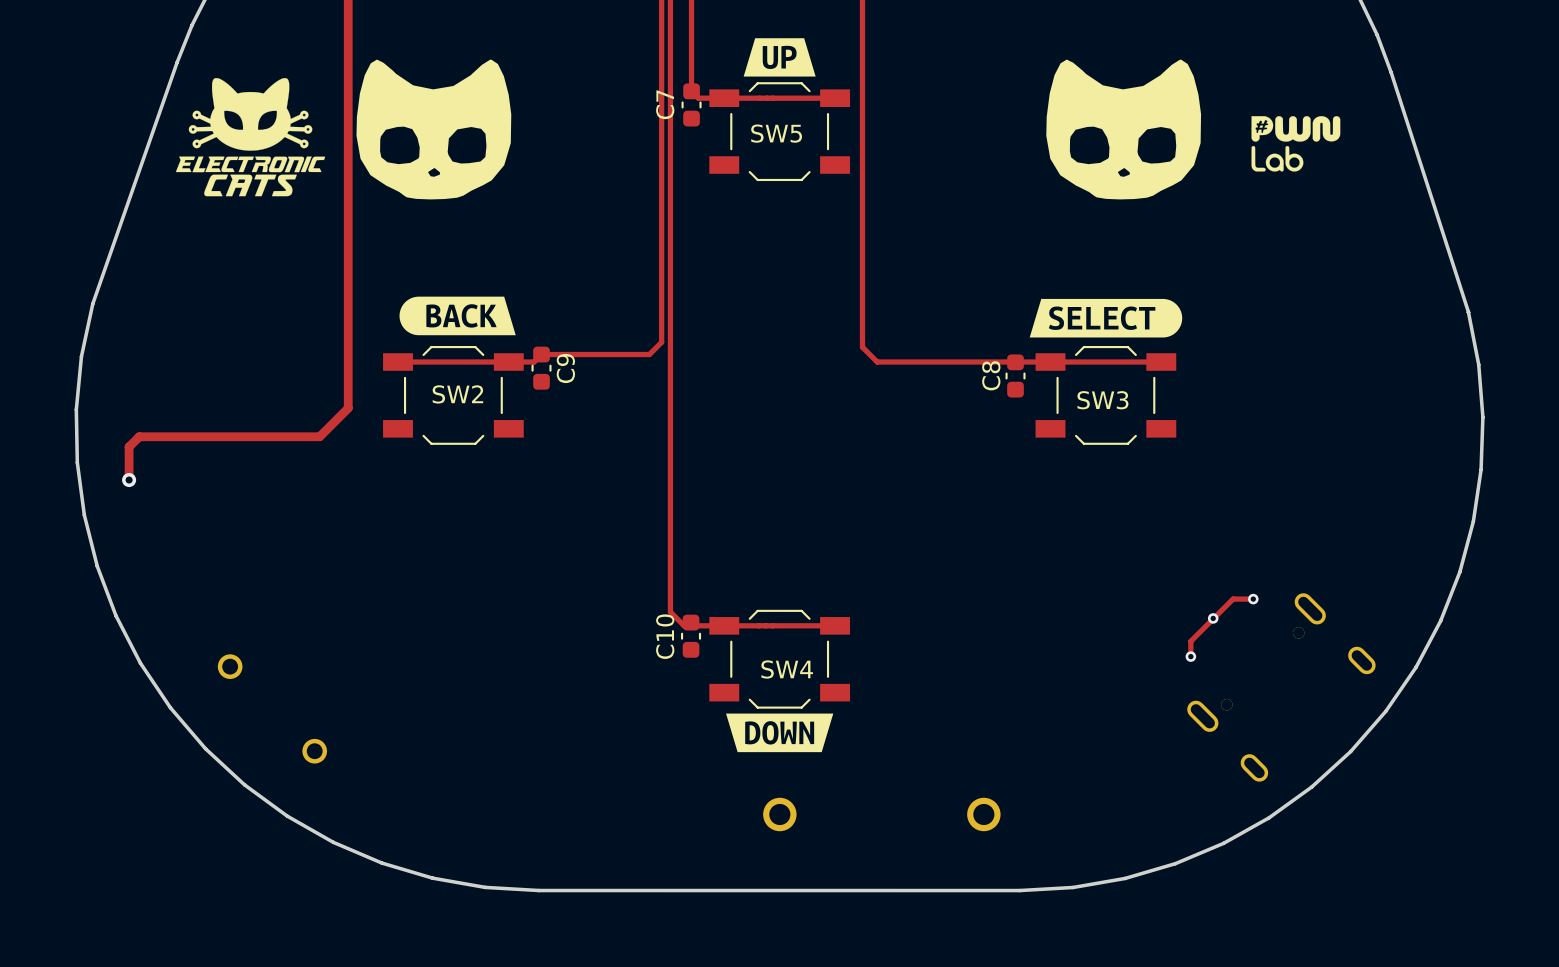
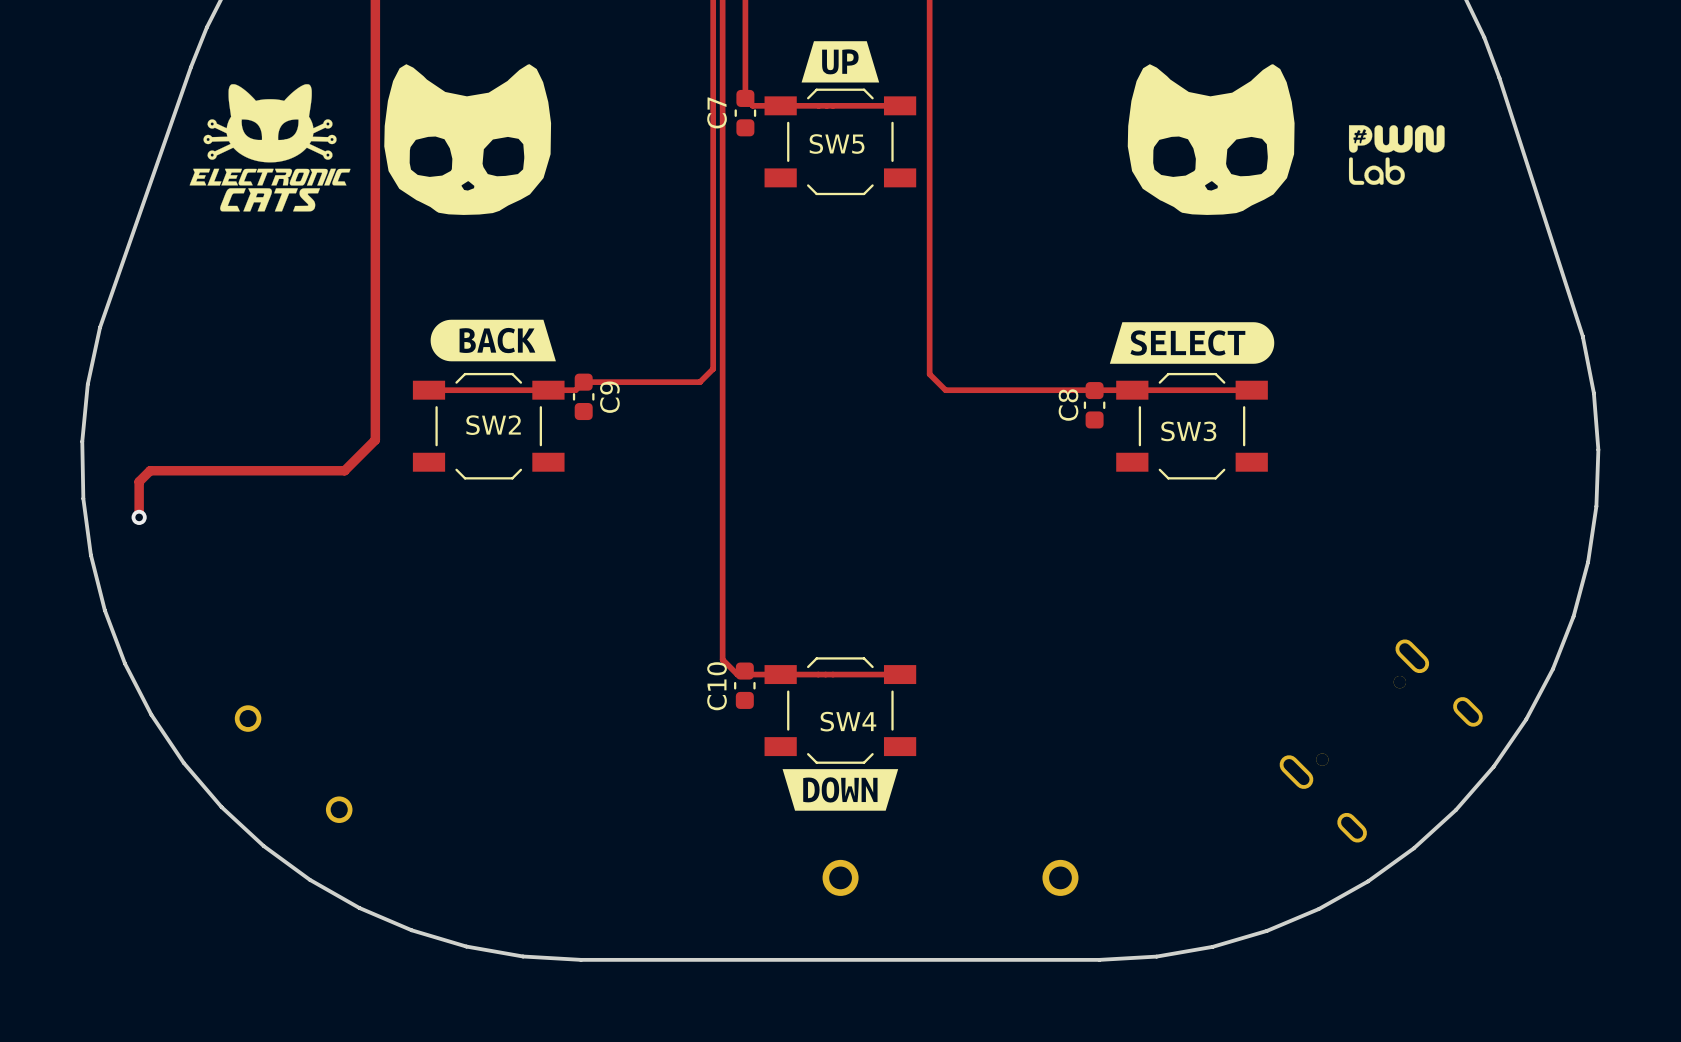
track: (1253, 599) (1233, 599) (1190, 641) (1190, 656) -> none
via: (1253, 599) -> none
via: (1213, 618) -> none
via: (1190, 656) -> none

